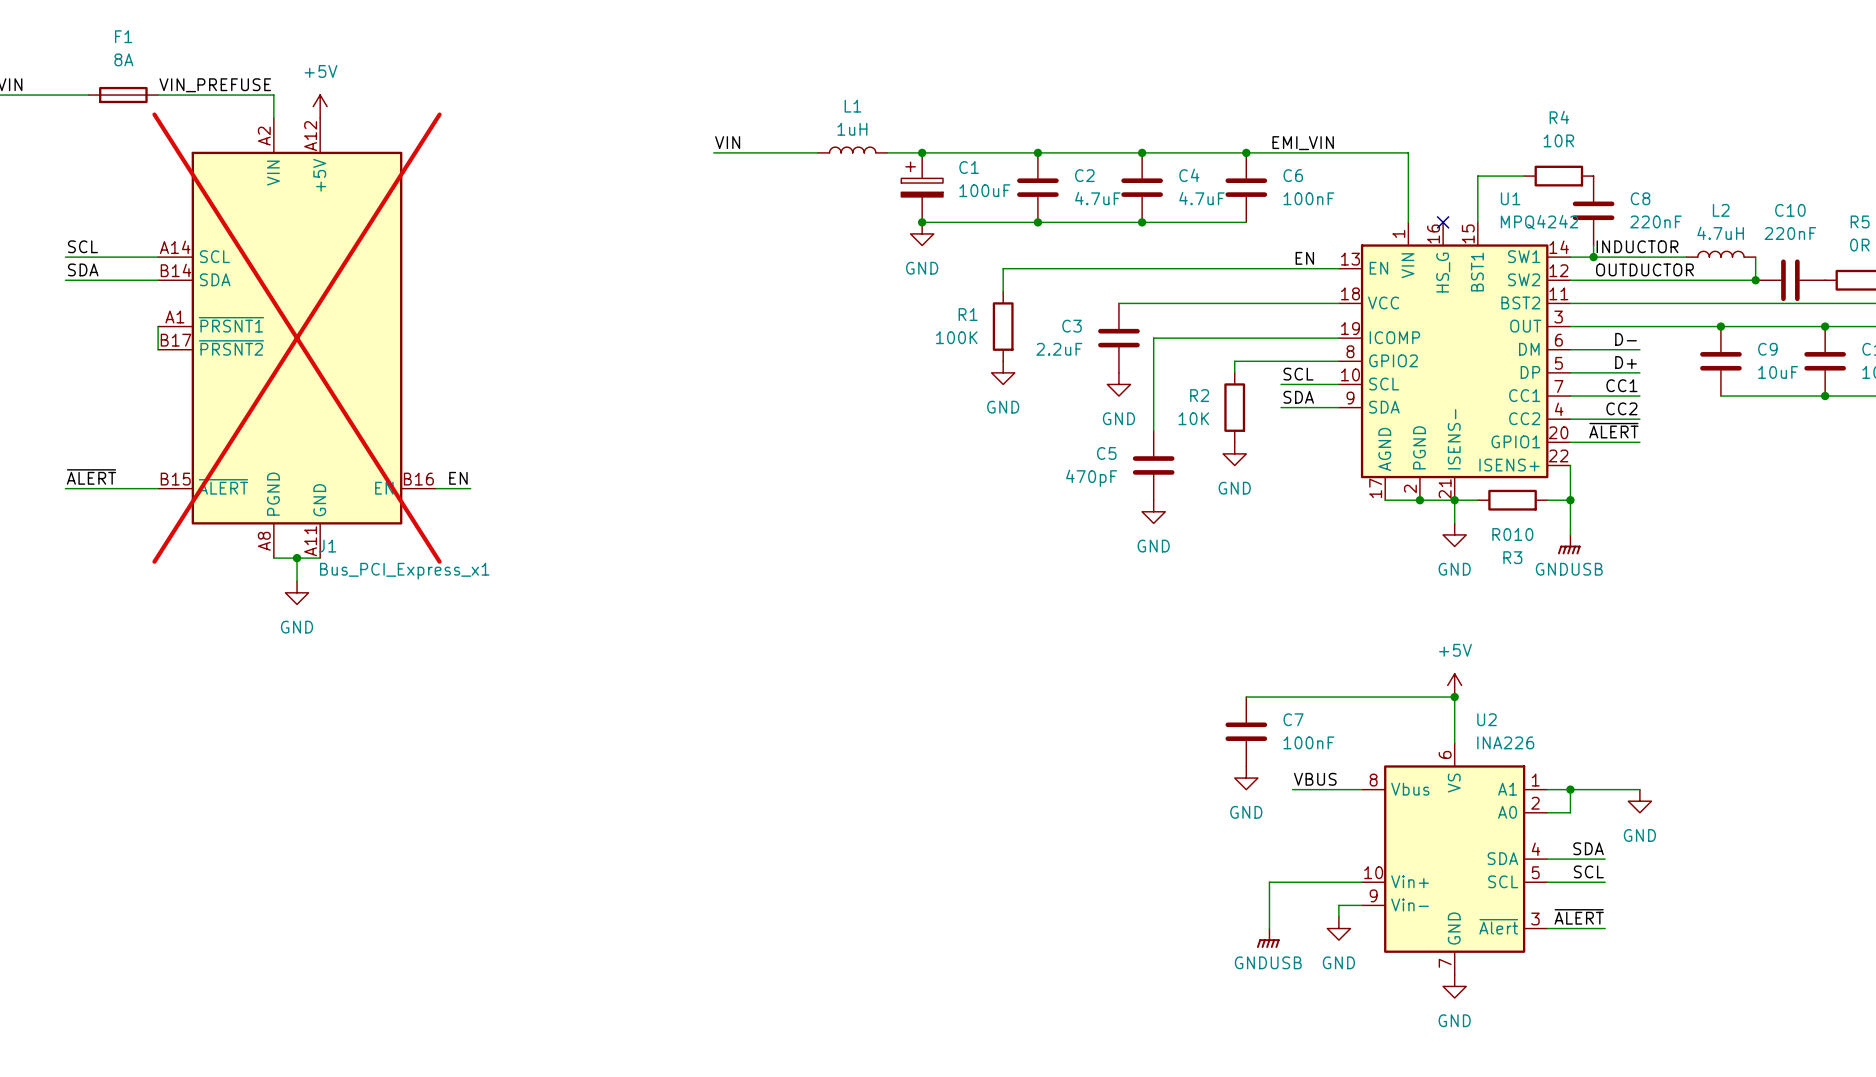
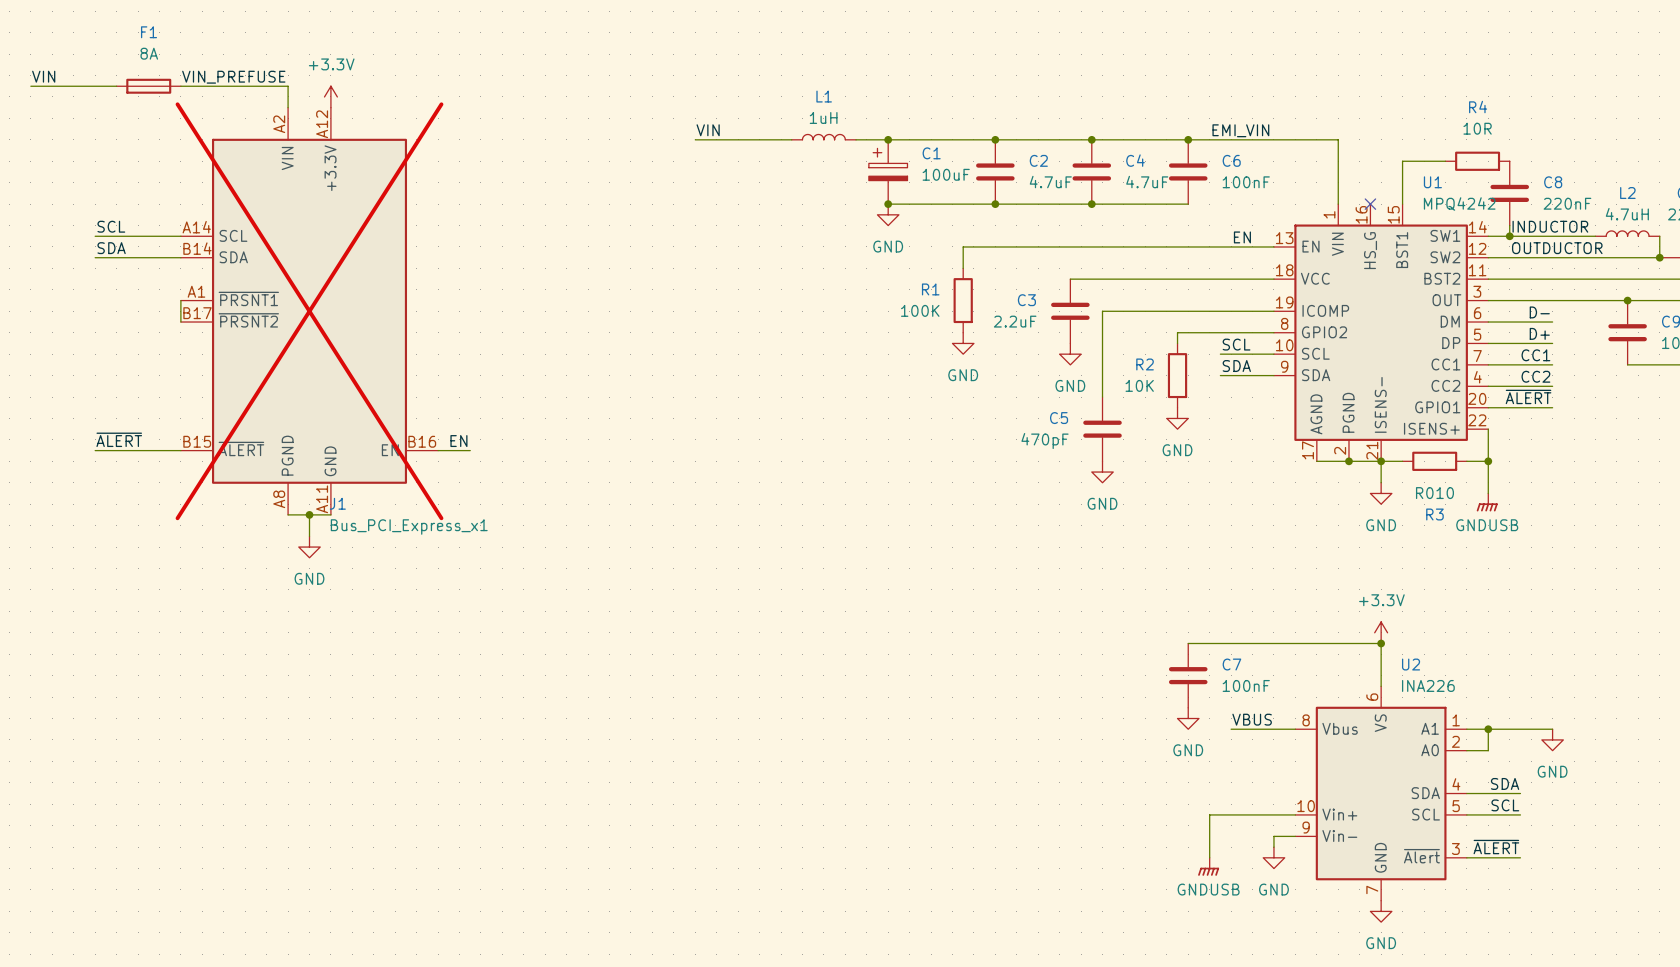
power symbol: +5V (320, 106) -> +3.3V (330, 96)
J1 pin name: +5V (319, 175) -> +3.3V (330, 168)
power symbol: +5V (1454, 685) -> +3.3V (1381, 632)

